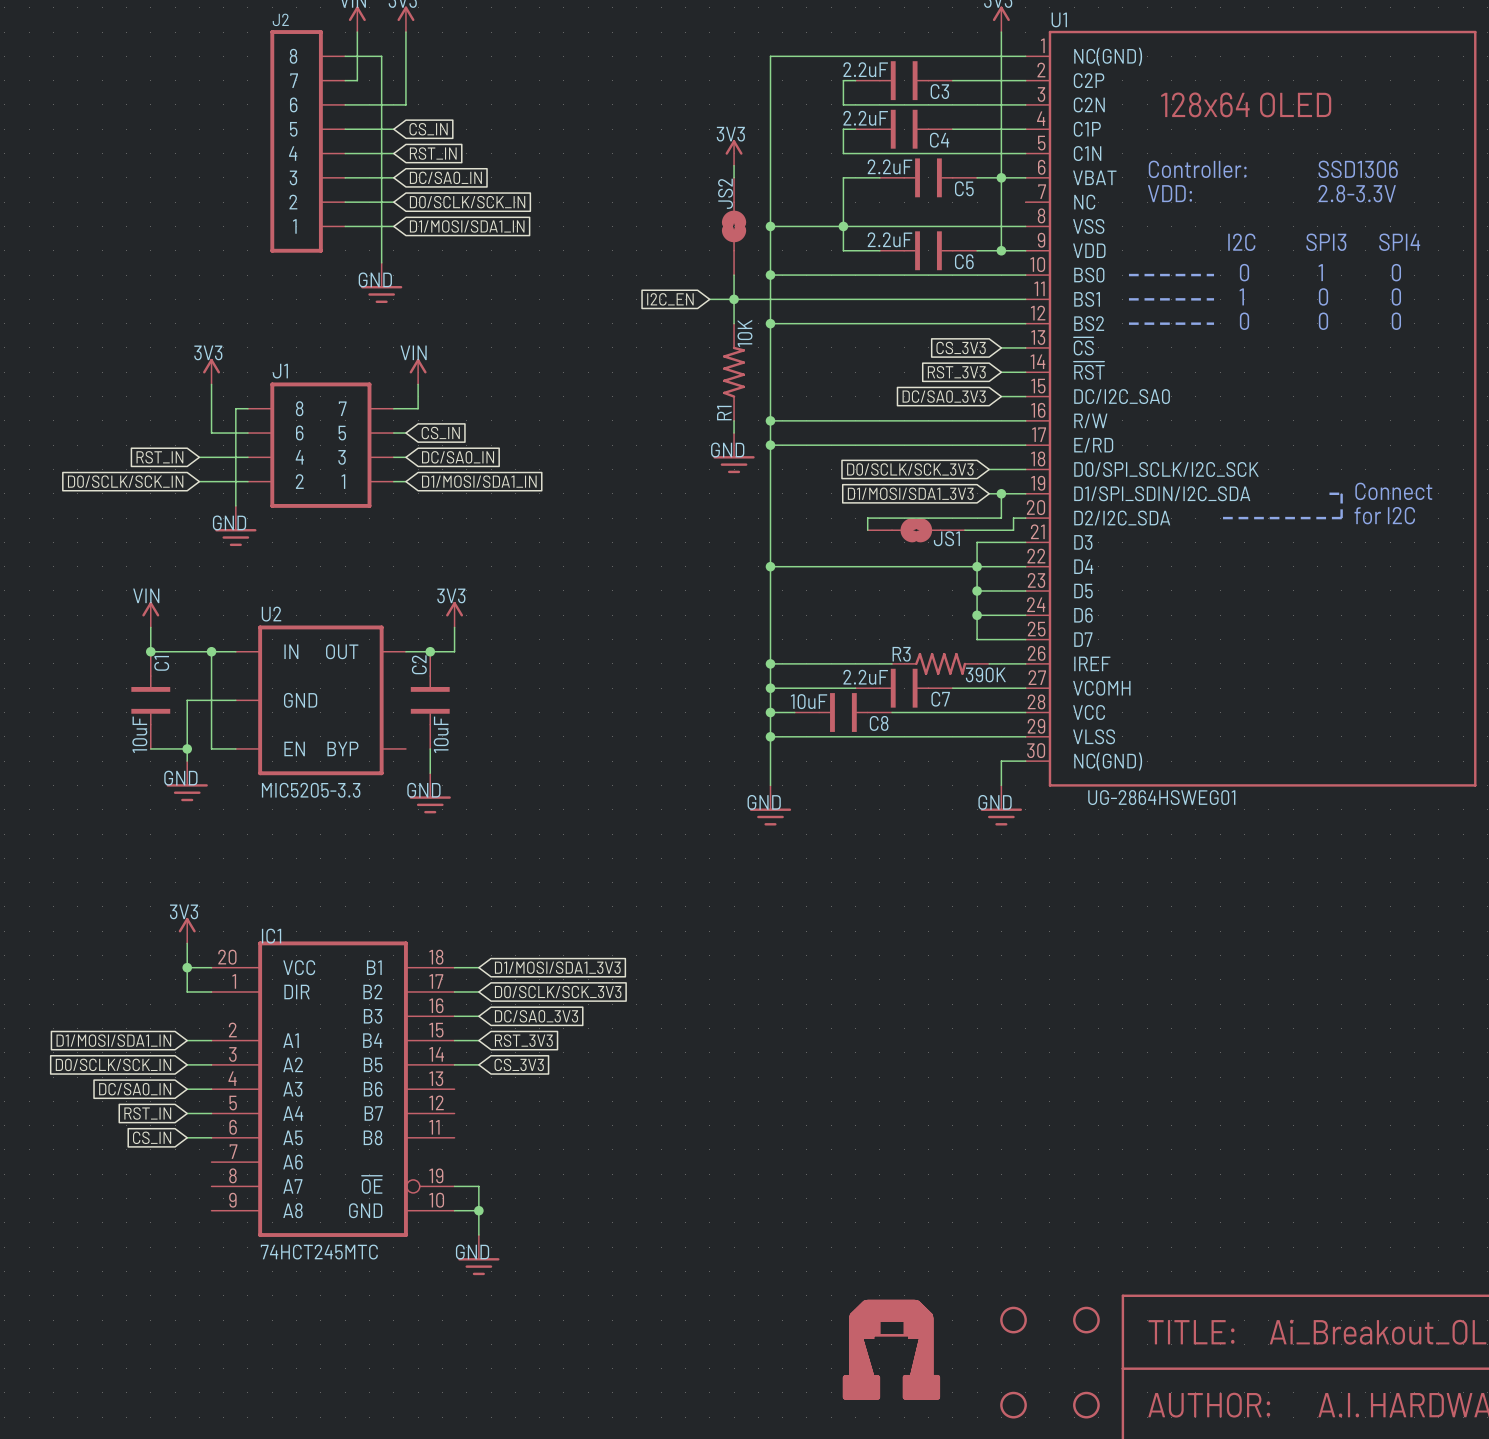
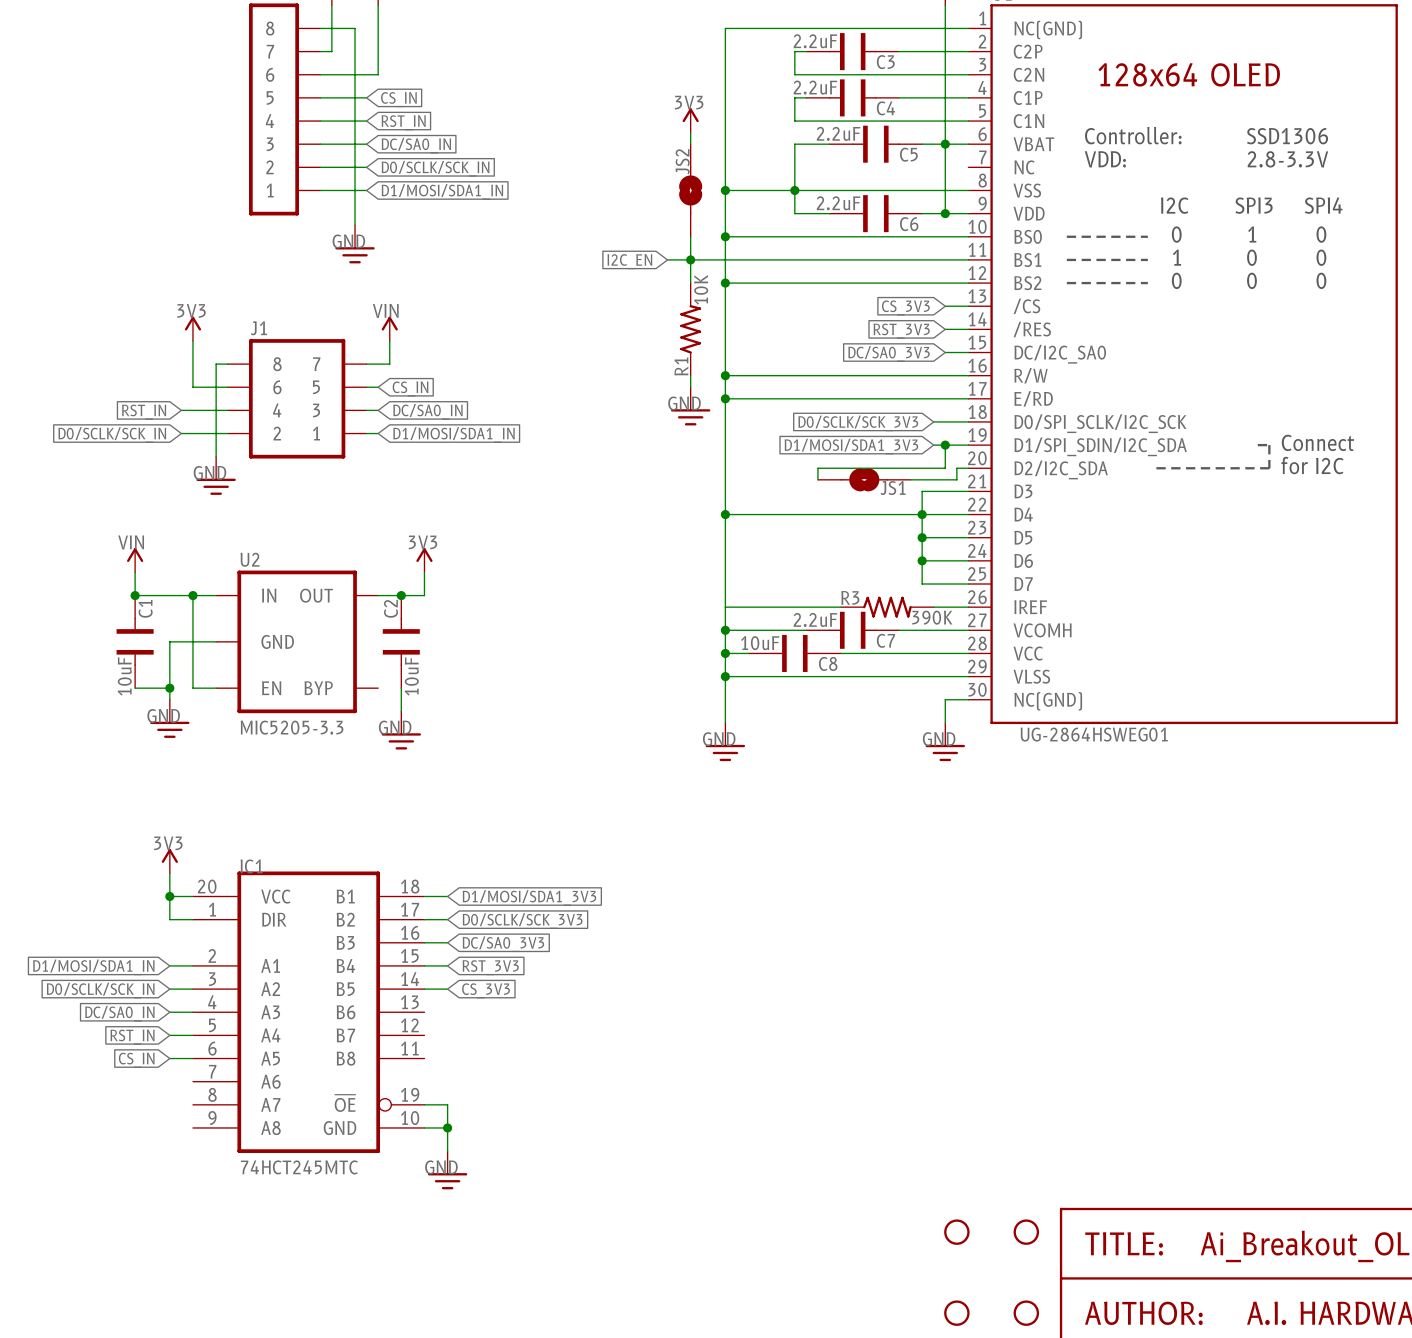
U1 pin name: ~{CS} (1083, 346) -> /CS (1026, 306)
U1 pin name: ~{RST} (1089, 370) -> /RES (1032, 329)
junction: (770, 663) -> none
part: (891, 1349) -> none

